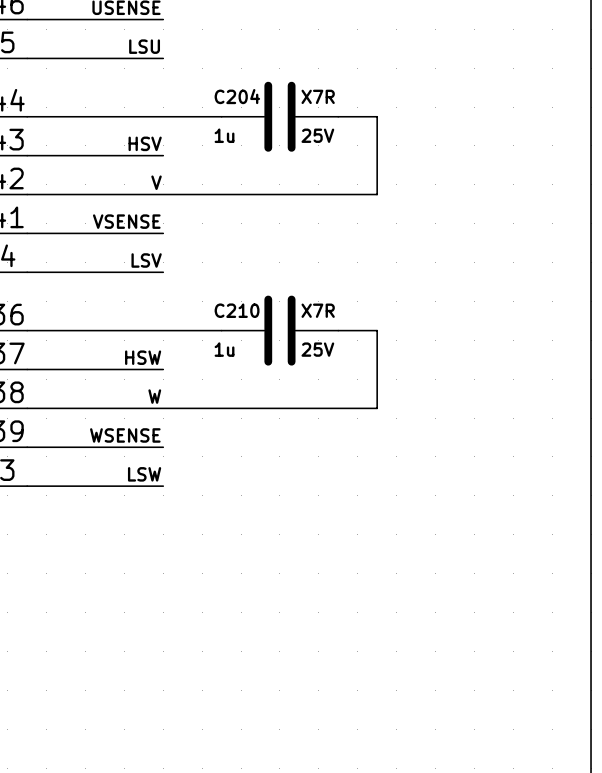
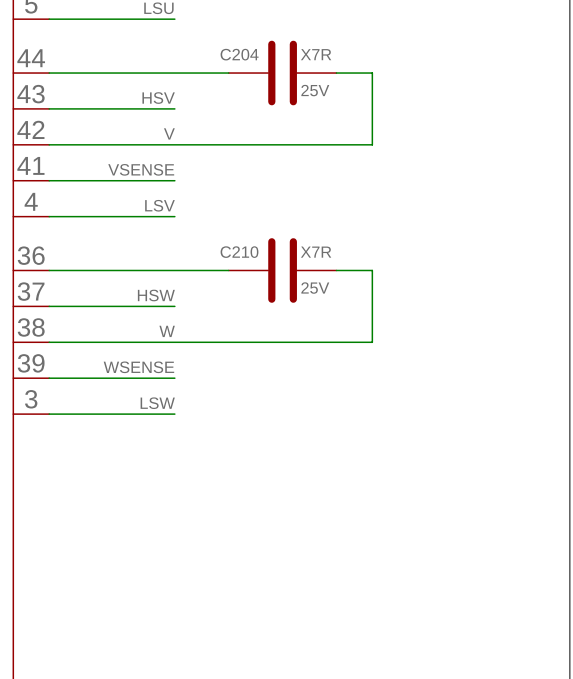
C204 value: 1u (224, 135) -> none
C210 value: 1u (224, 349) -> none

